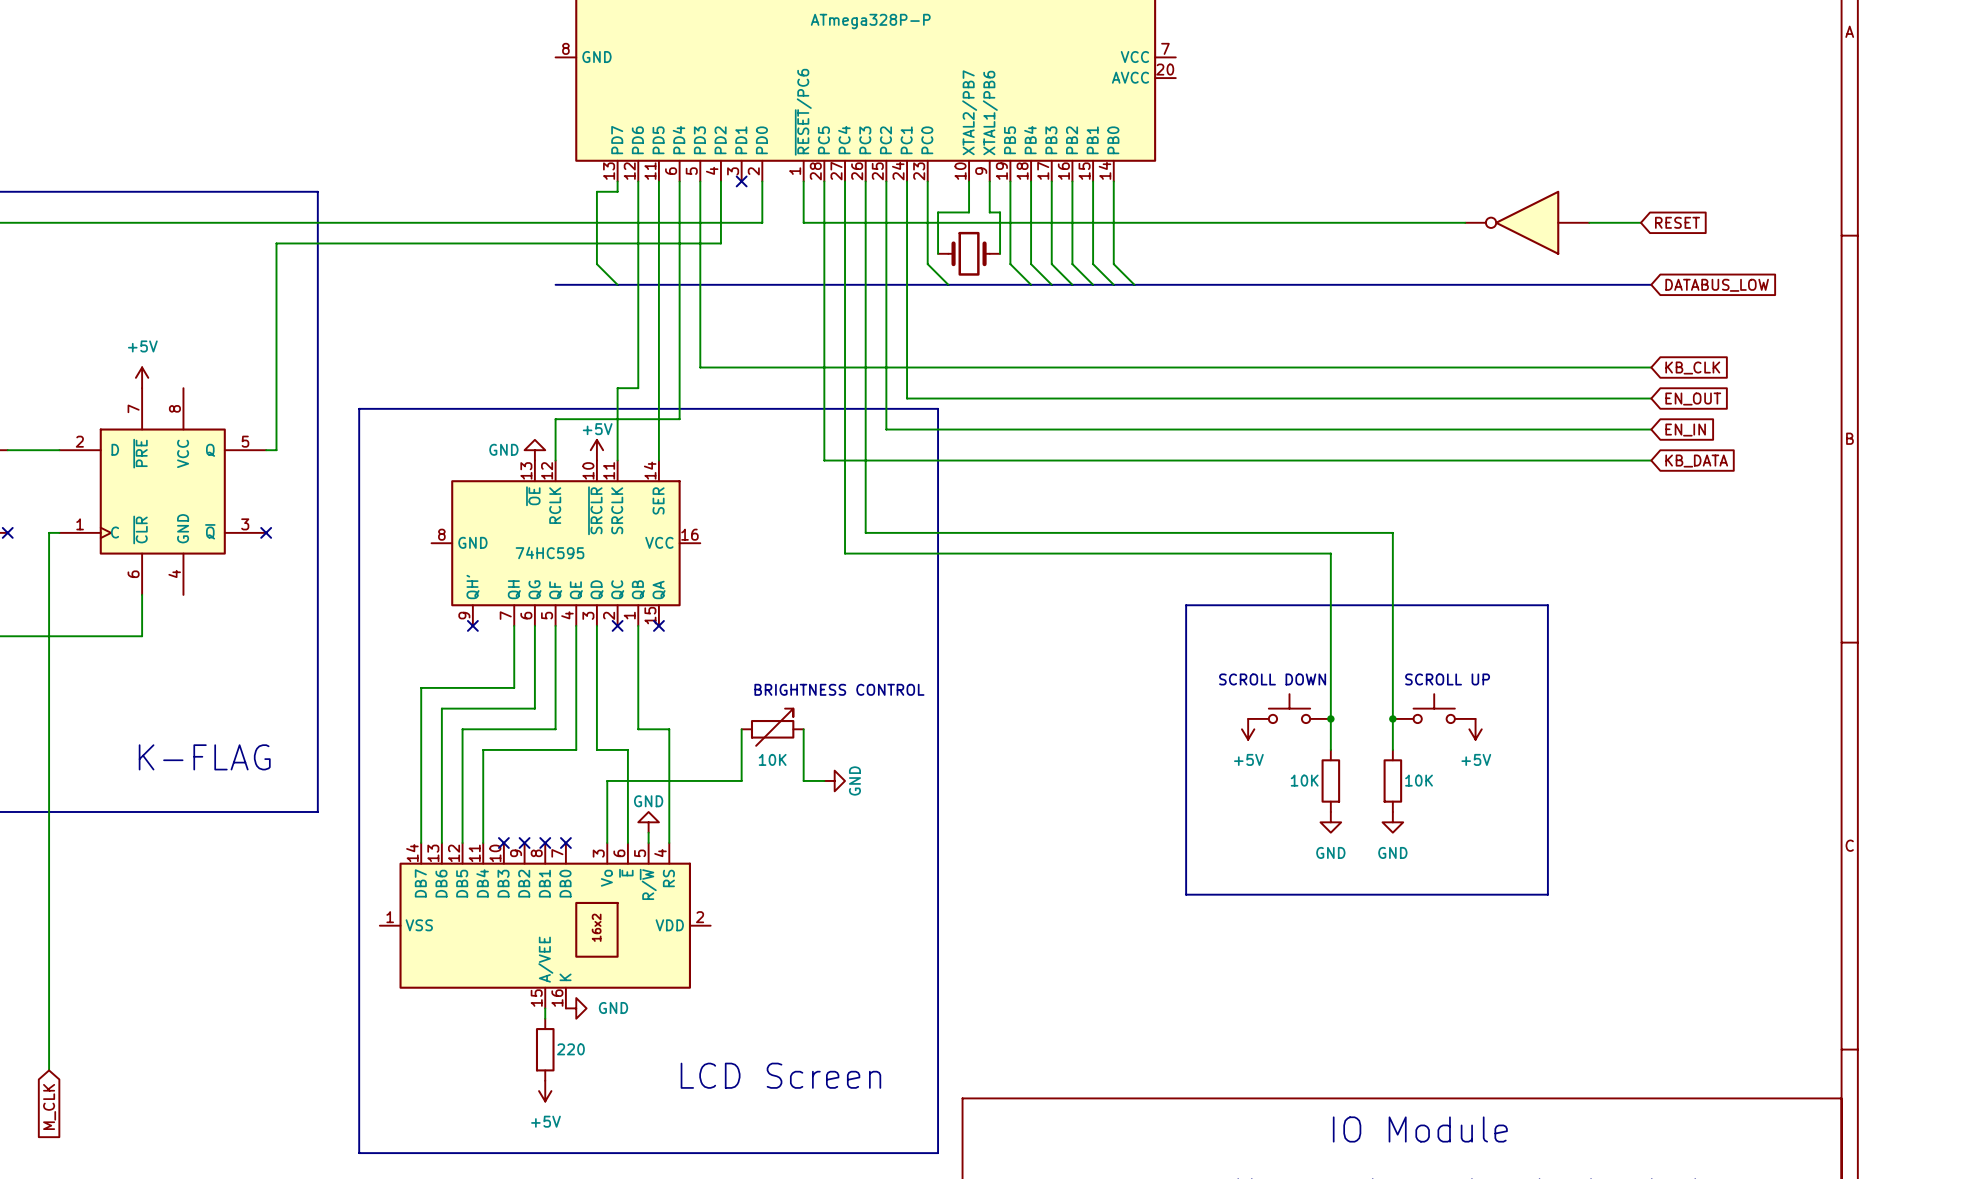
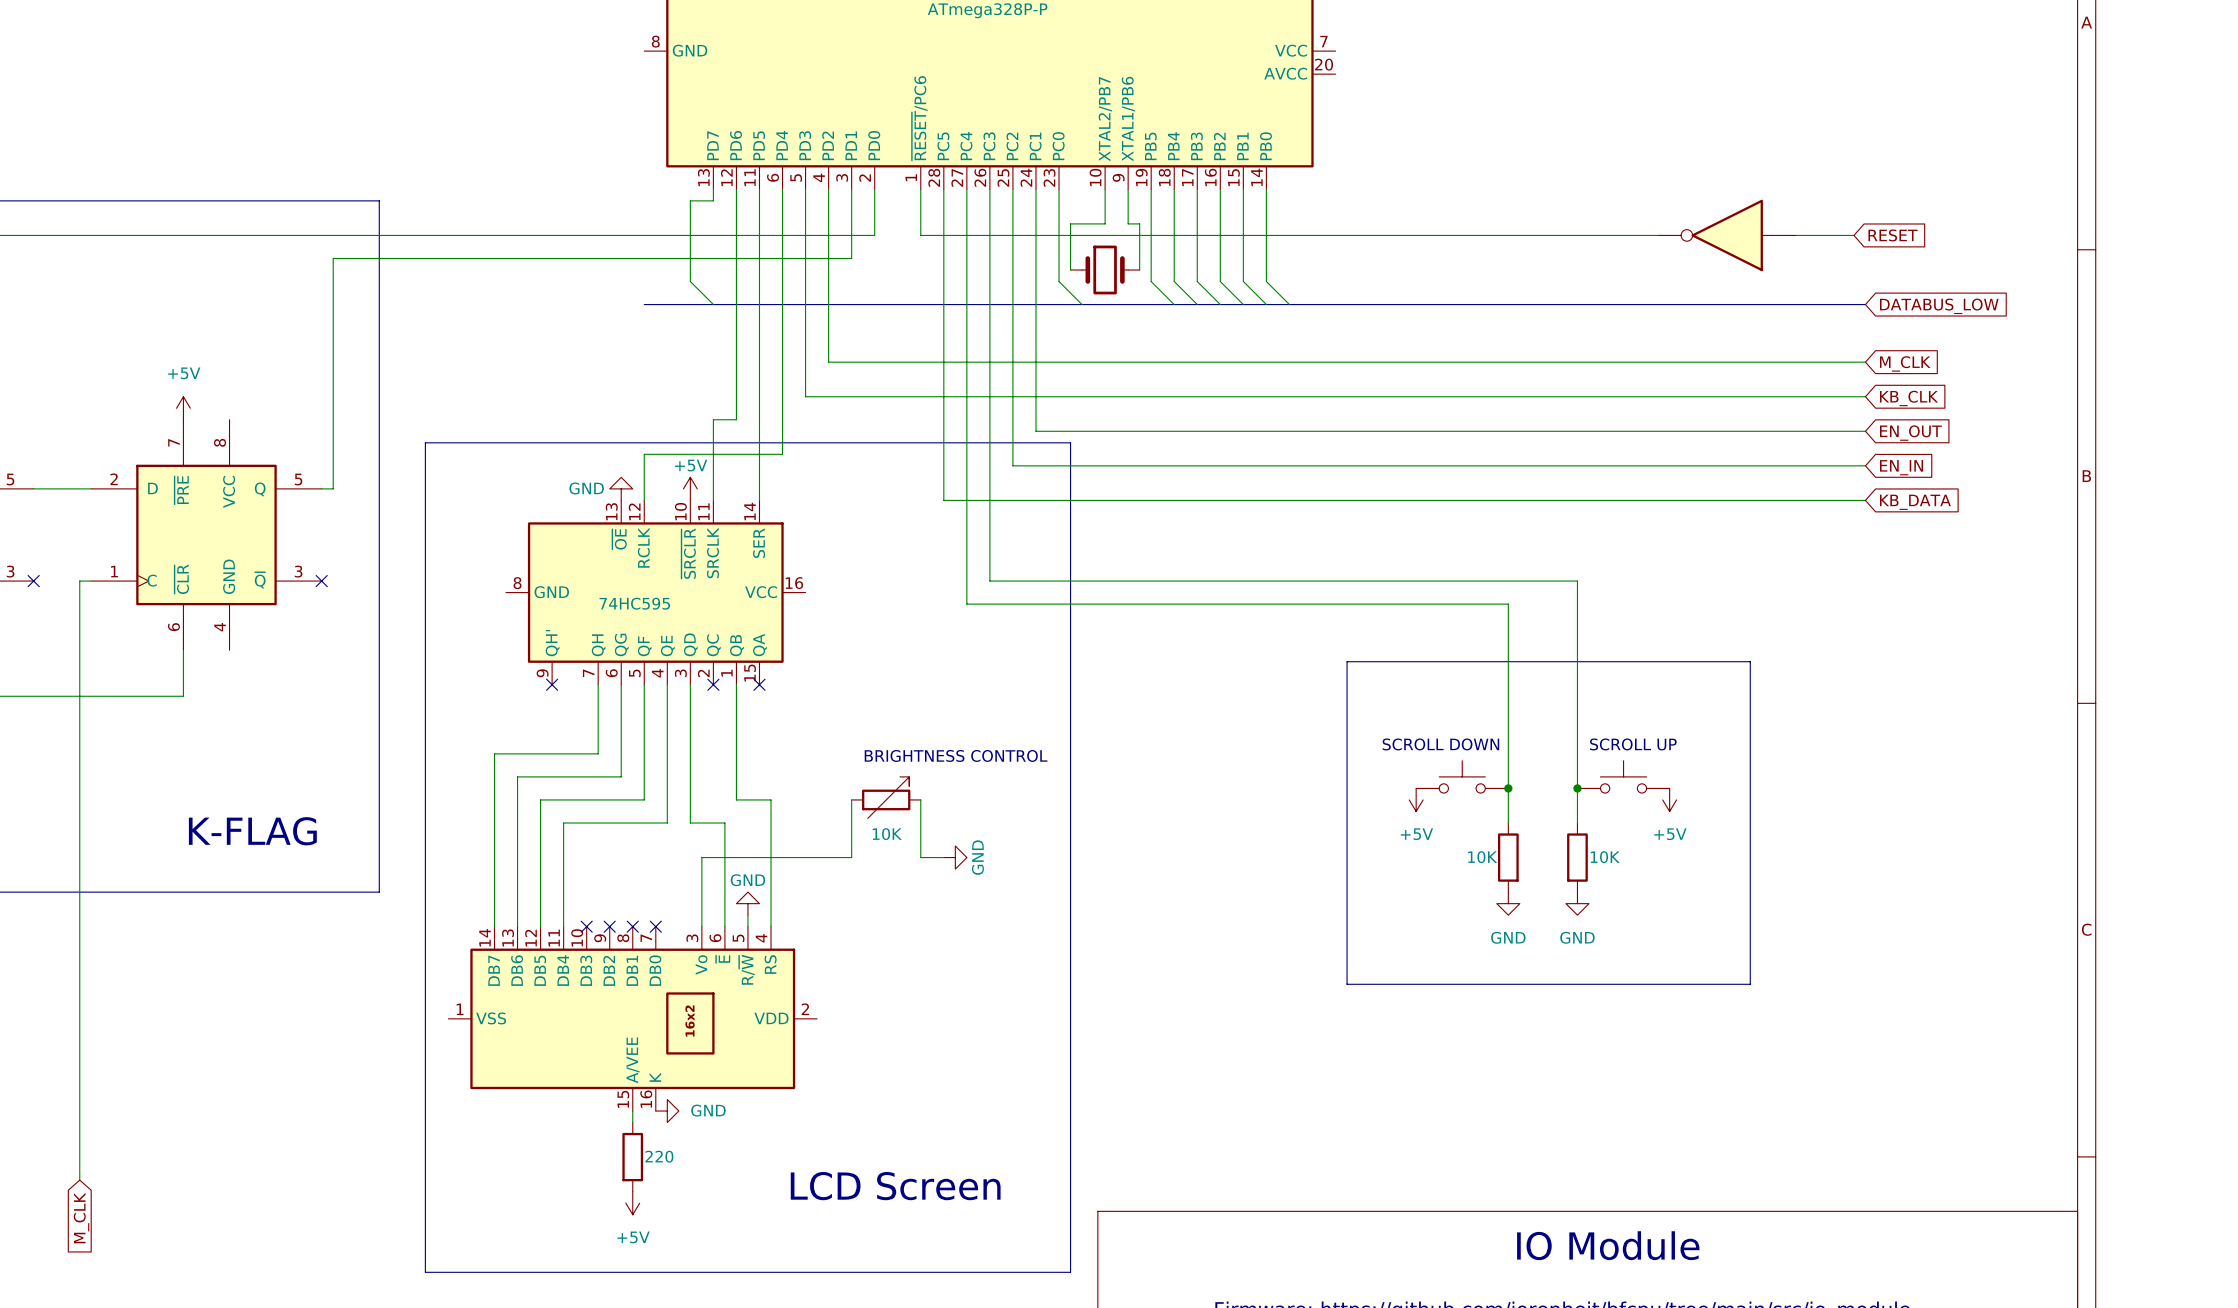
wire: none -> (851, 189) (851, 258) (828, 258) (828, 362) (1865, 362)
no-connect mark: (741, 181) -> none
global label: none -> M_CLK (1905, 363)

